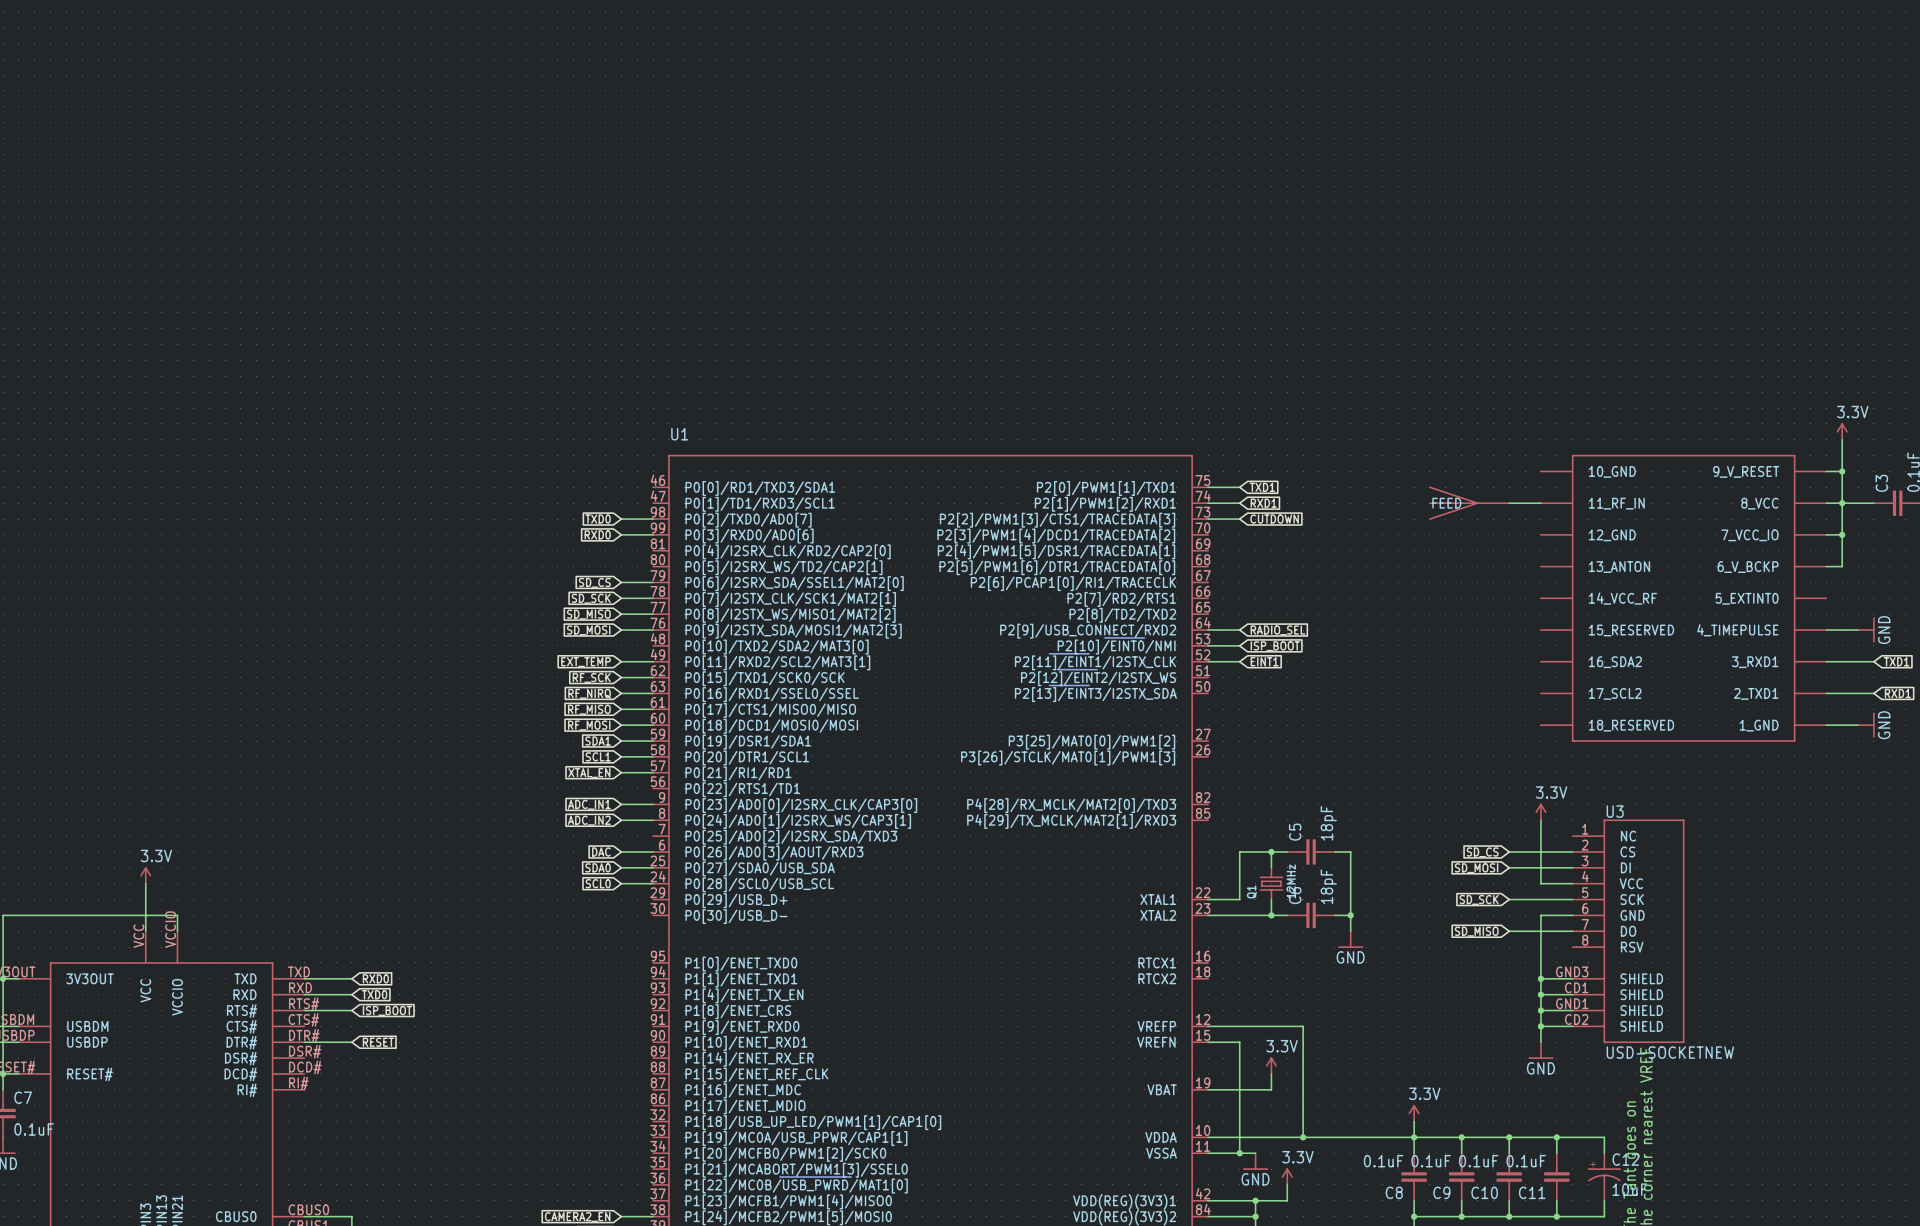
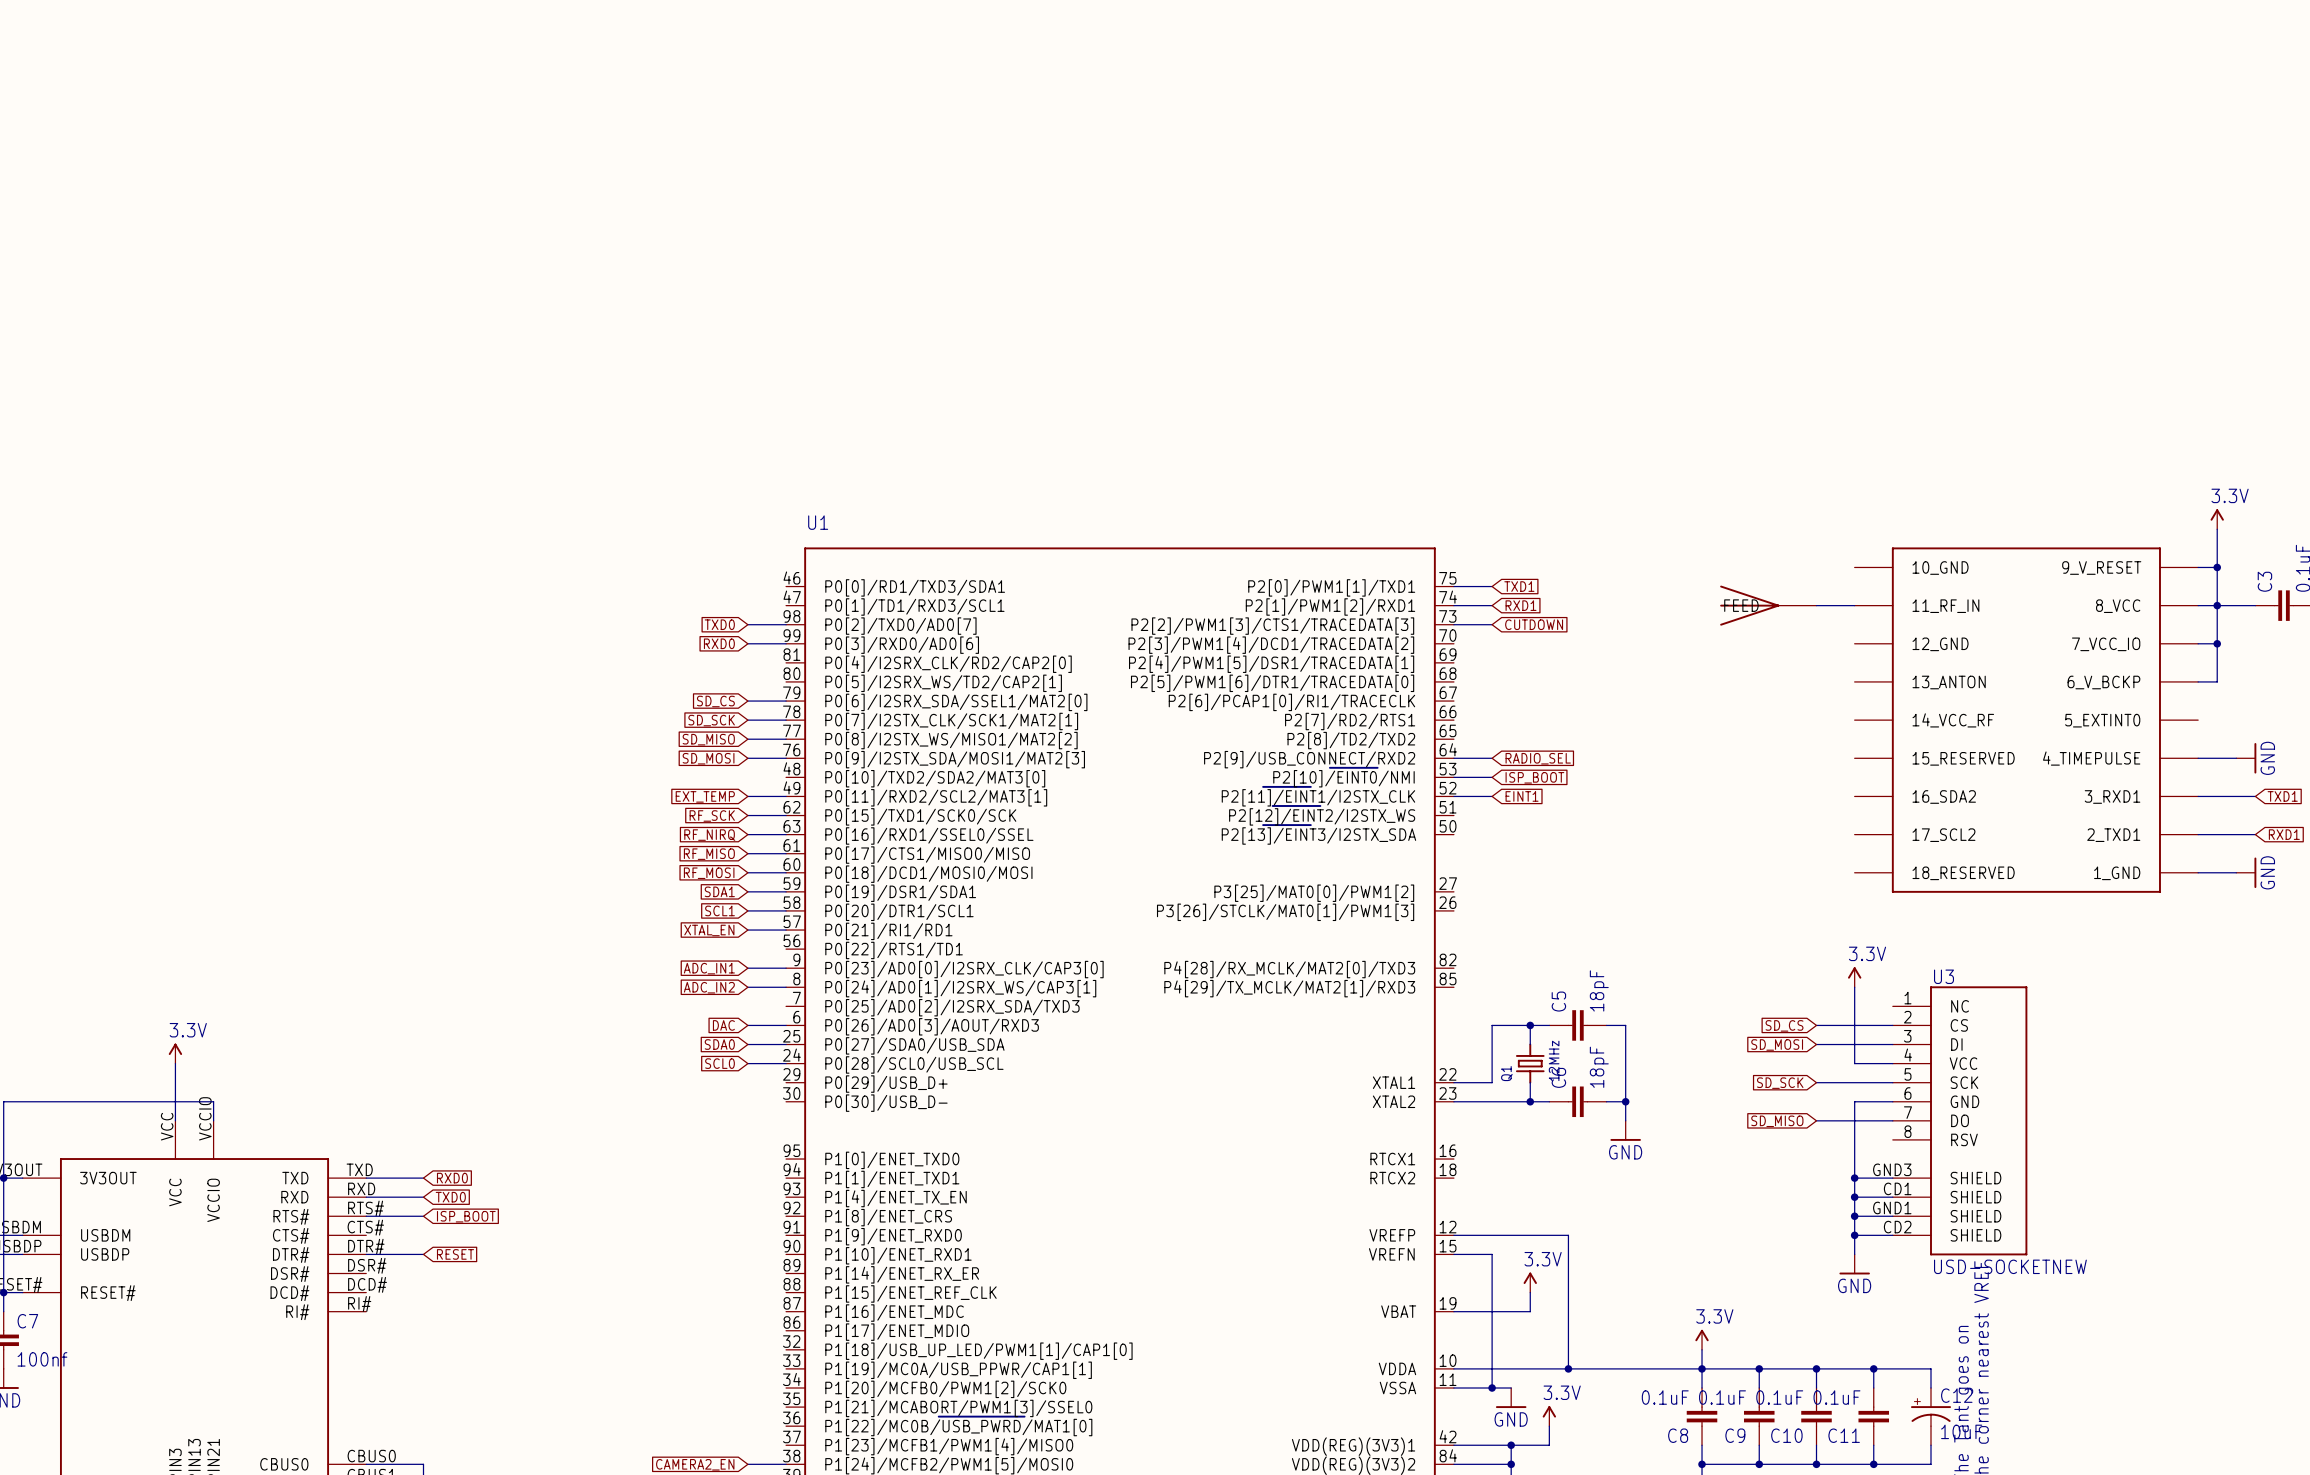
C7 value: 0.1uF (34, 1129) -> 100nf (42, 1359)

